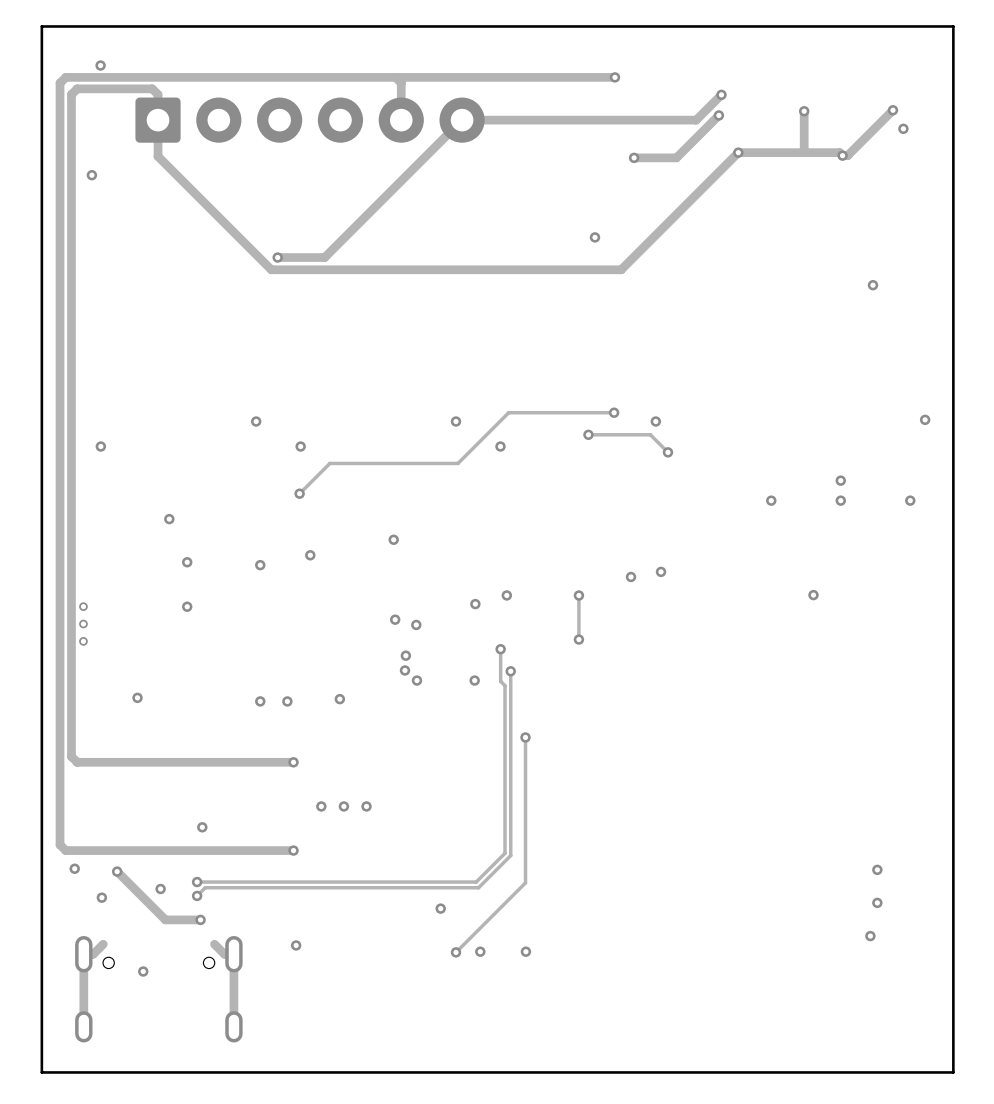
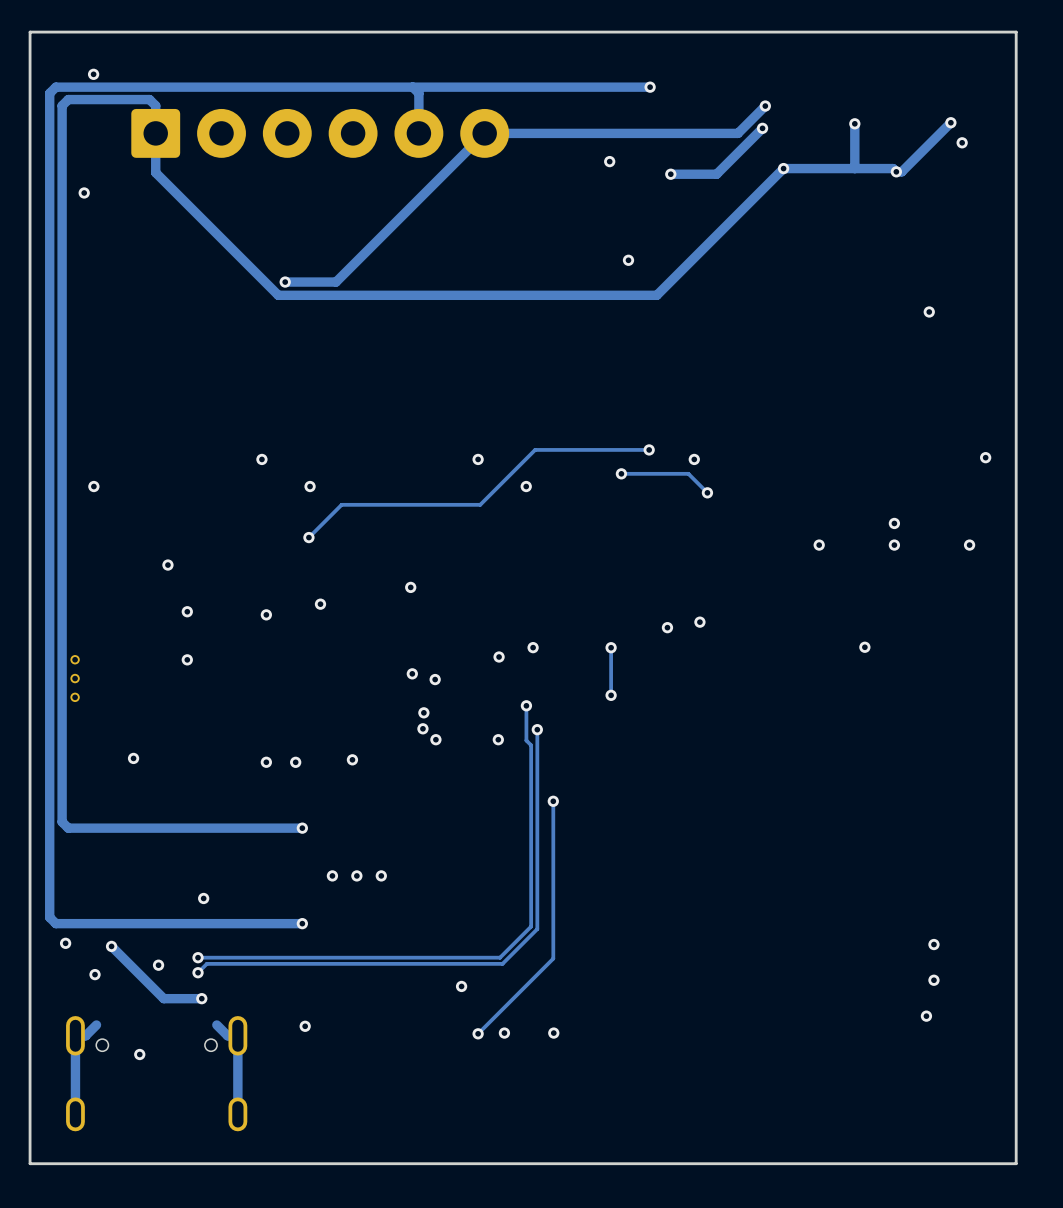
via: none -> (609, 161)

